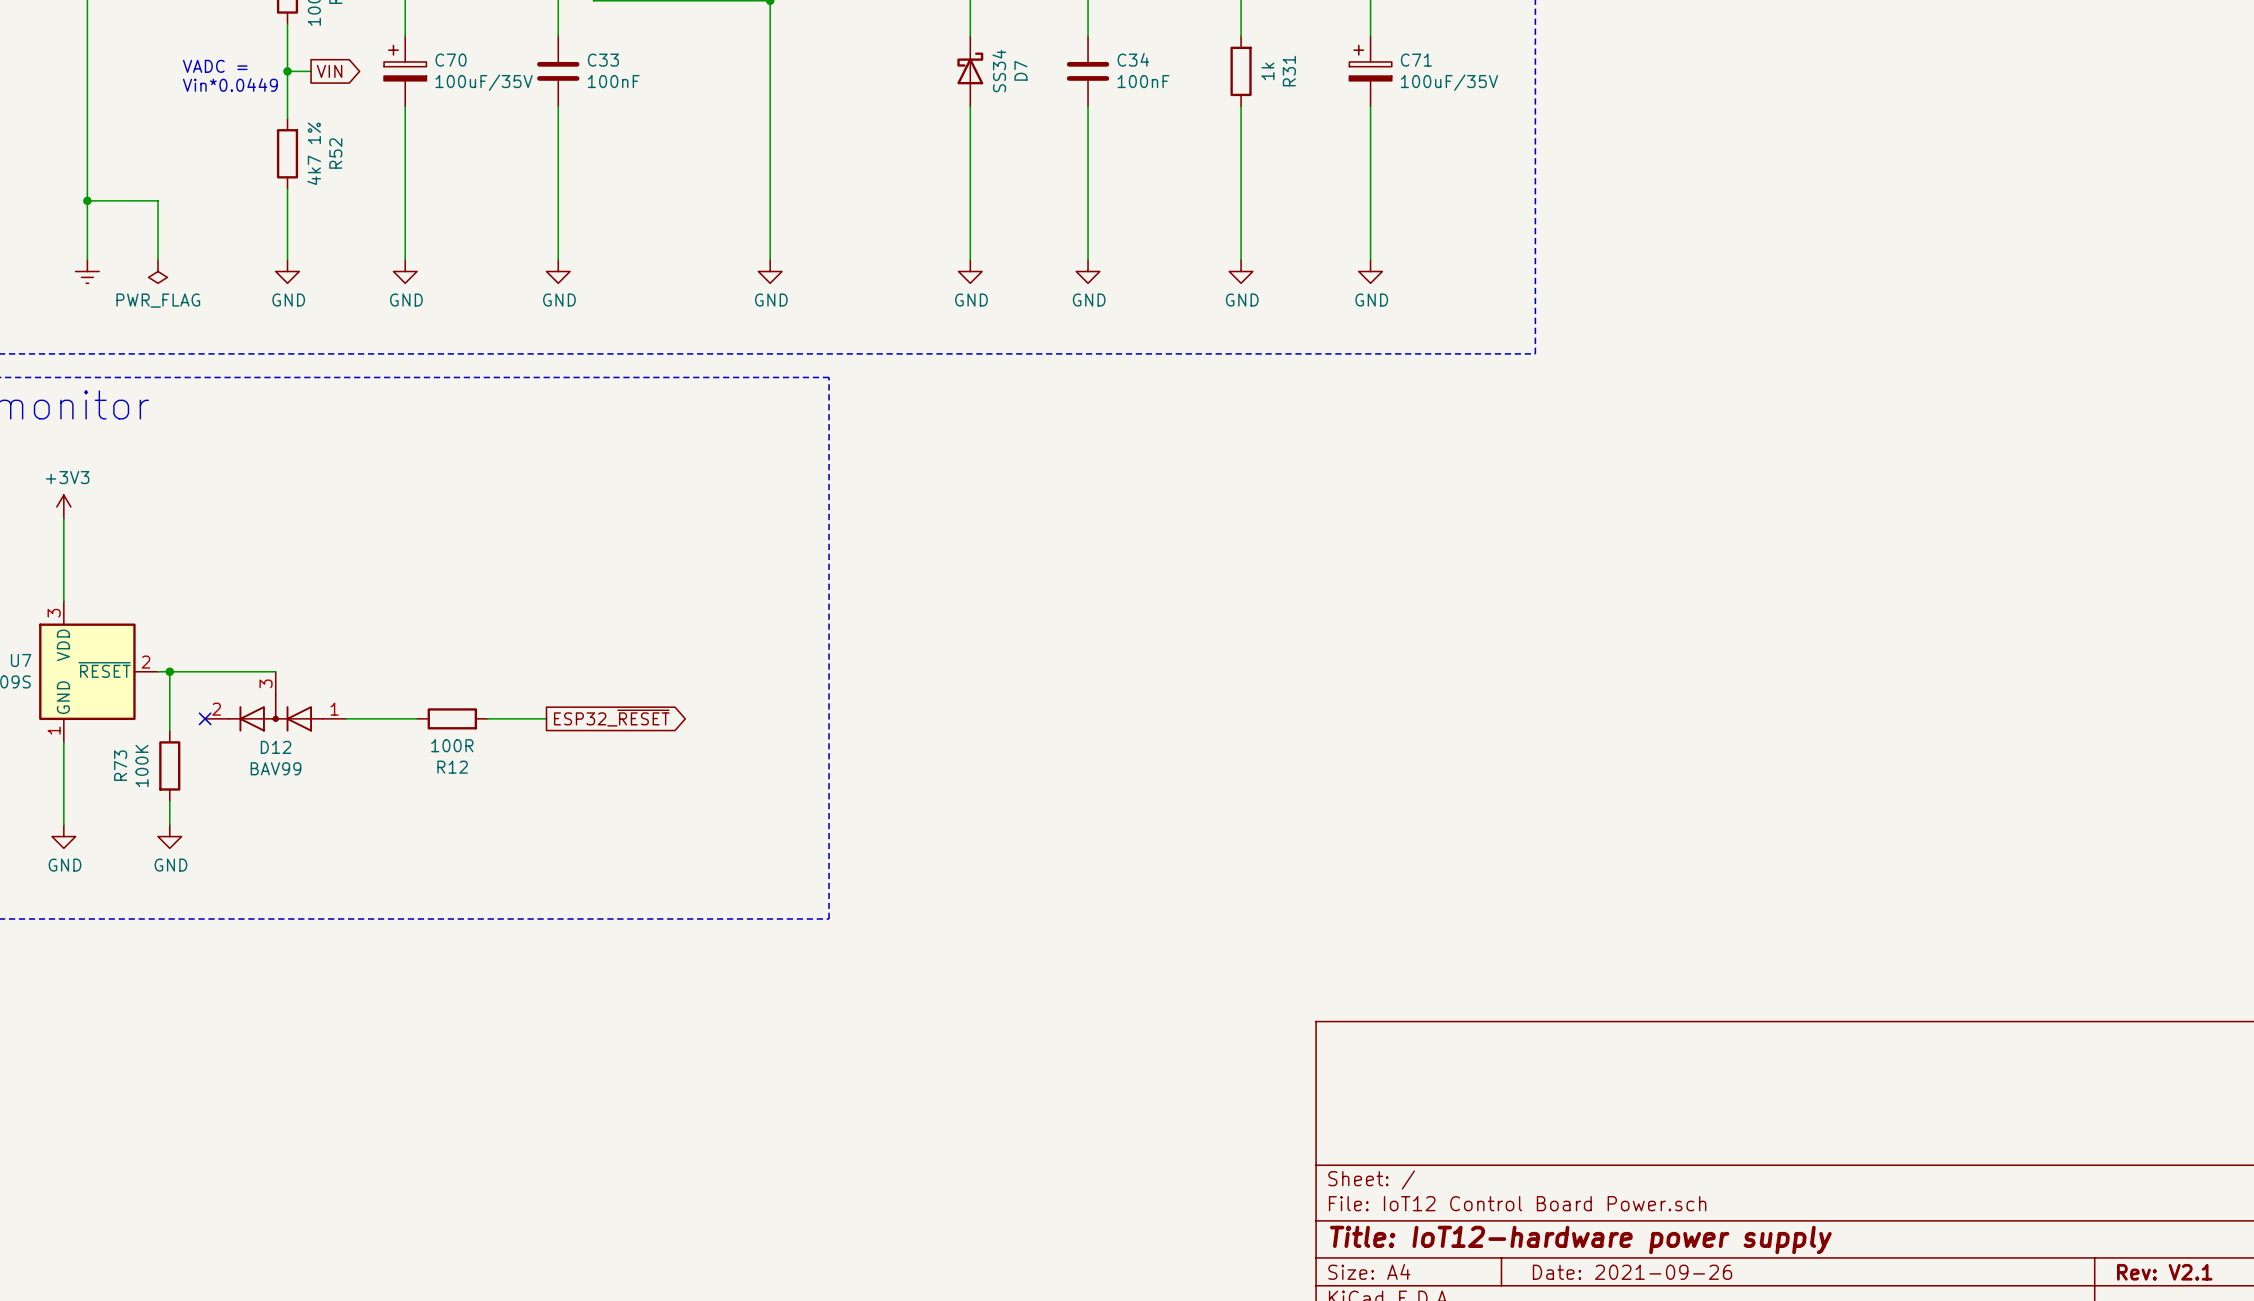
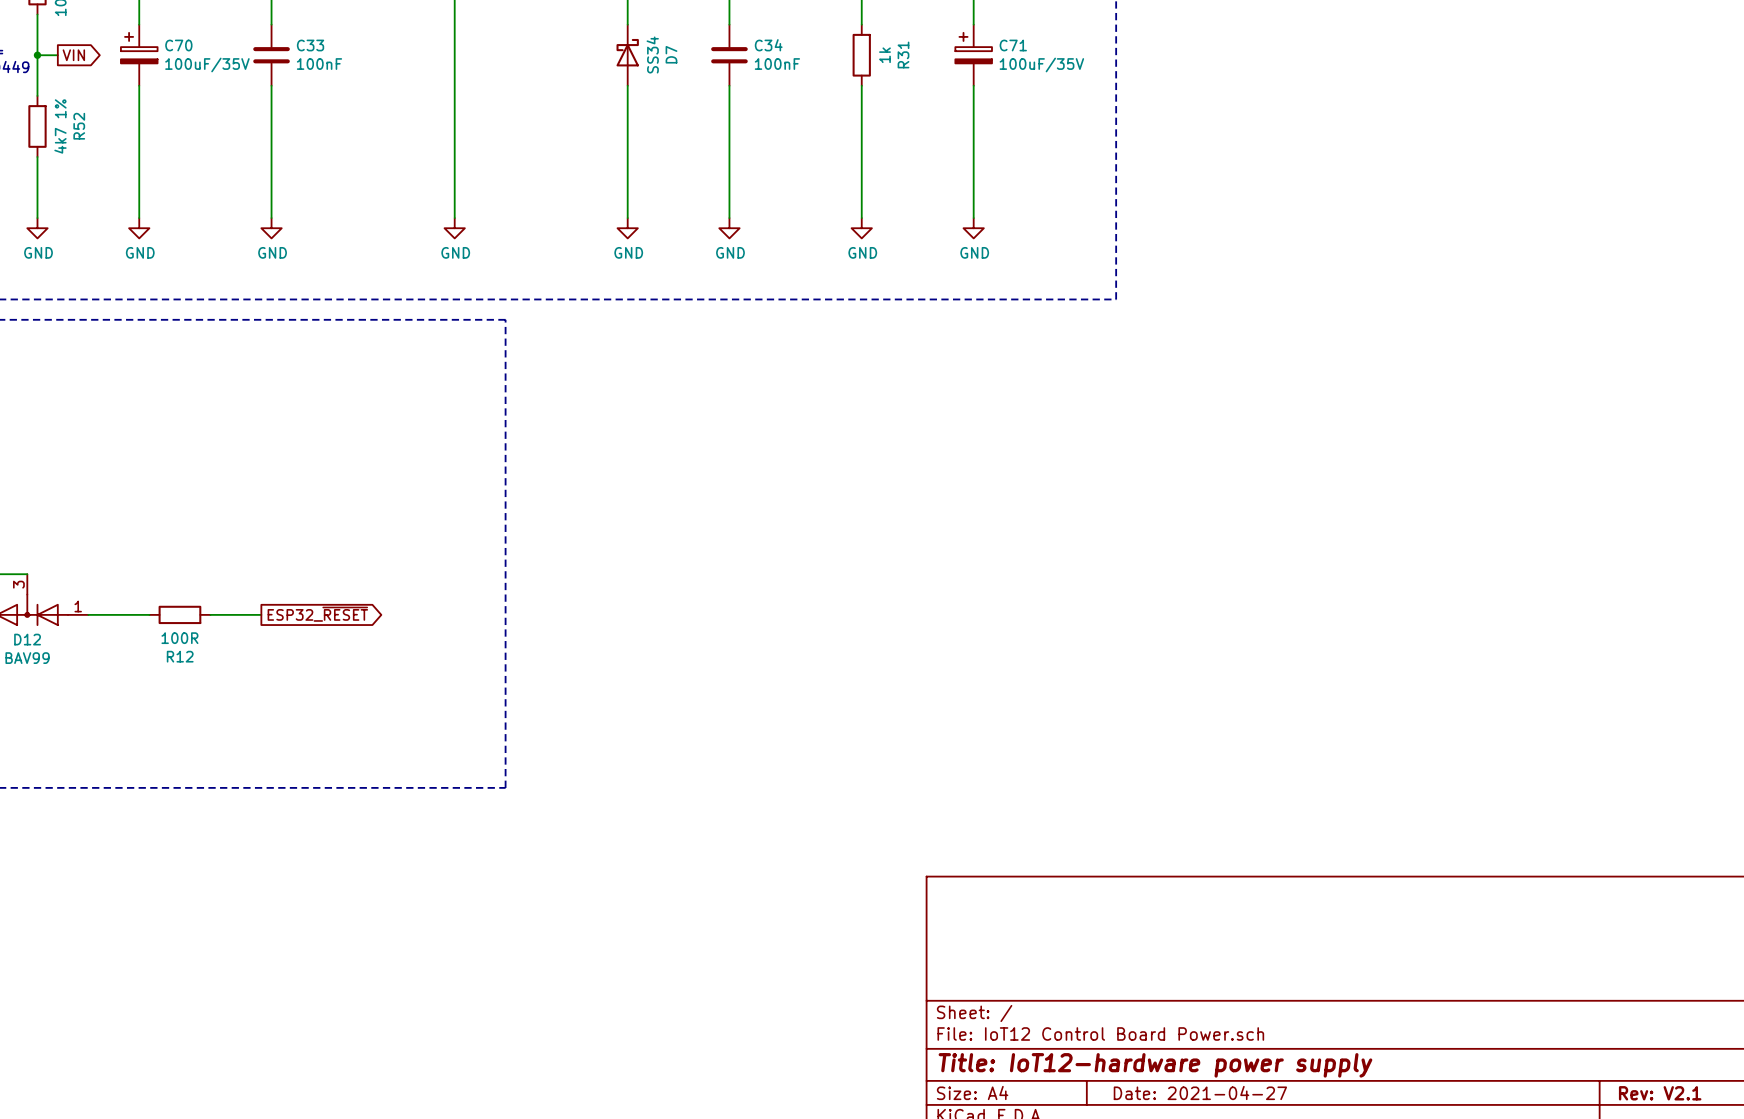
title block: Date: 2021-09-26 (1632, 1272) -> Date: 2021-04-27 (1200, 1092)

